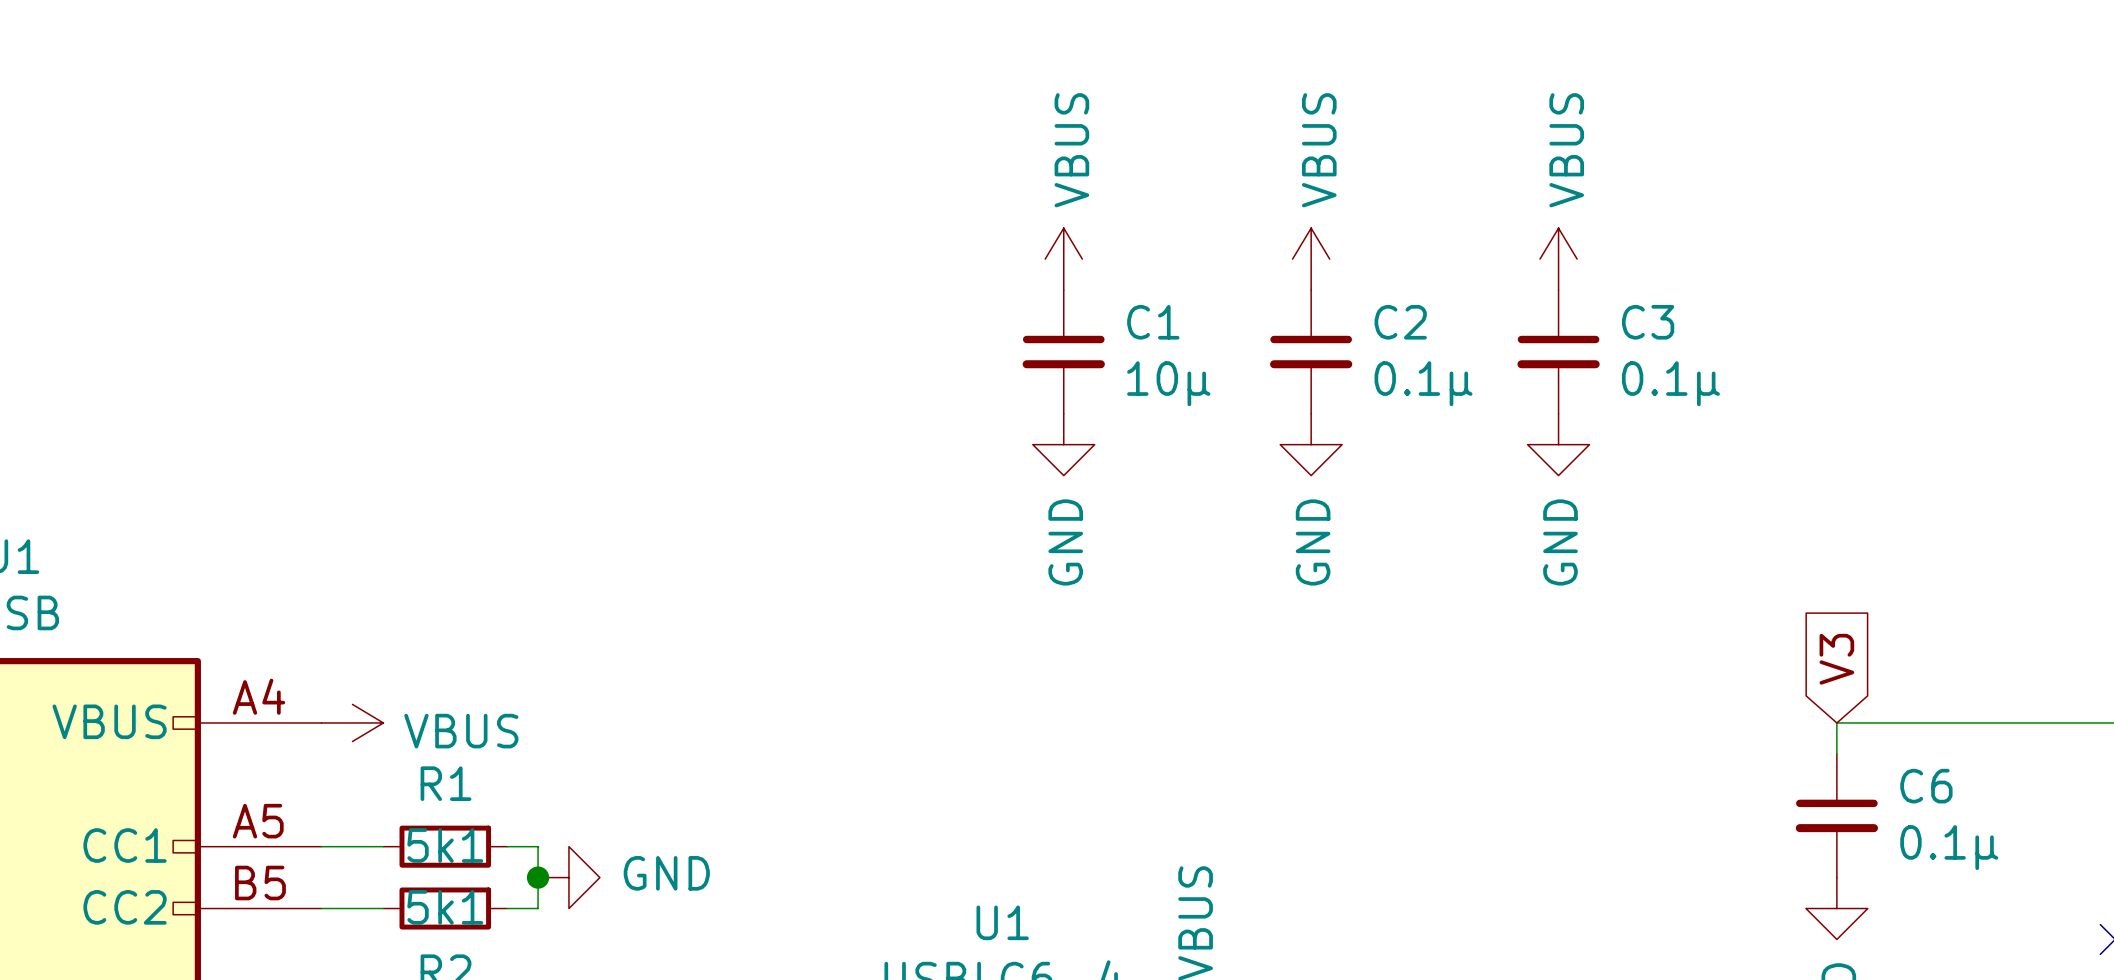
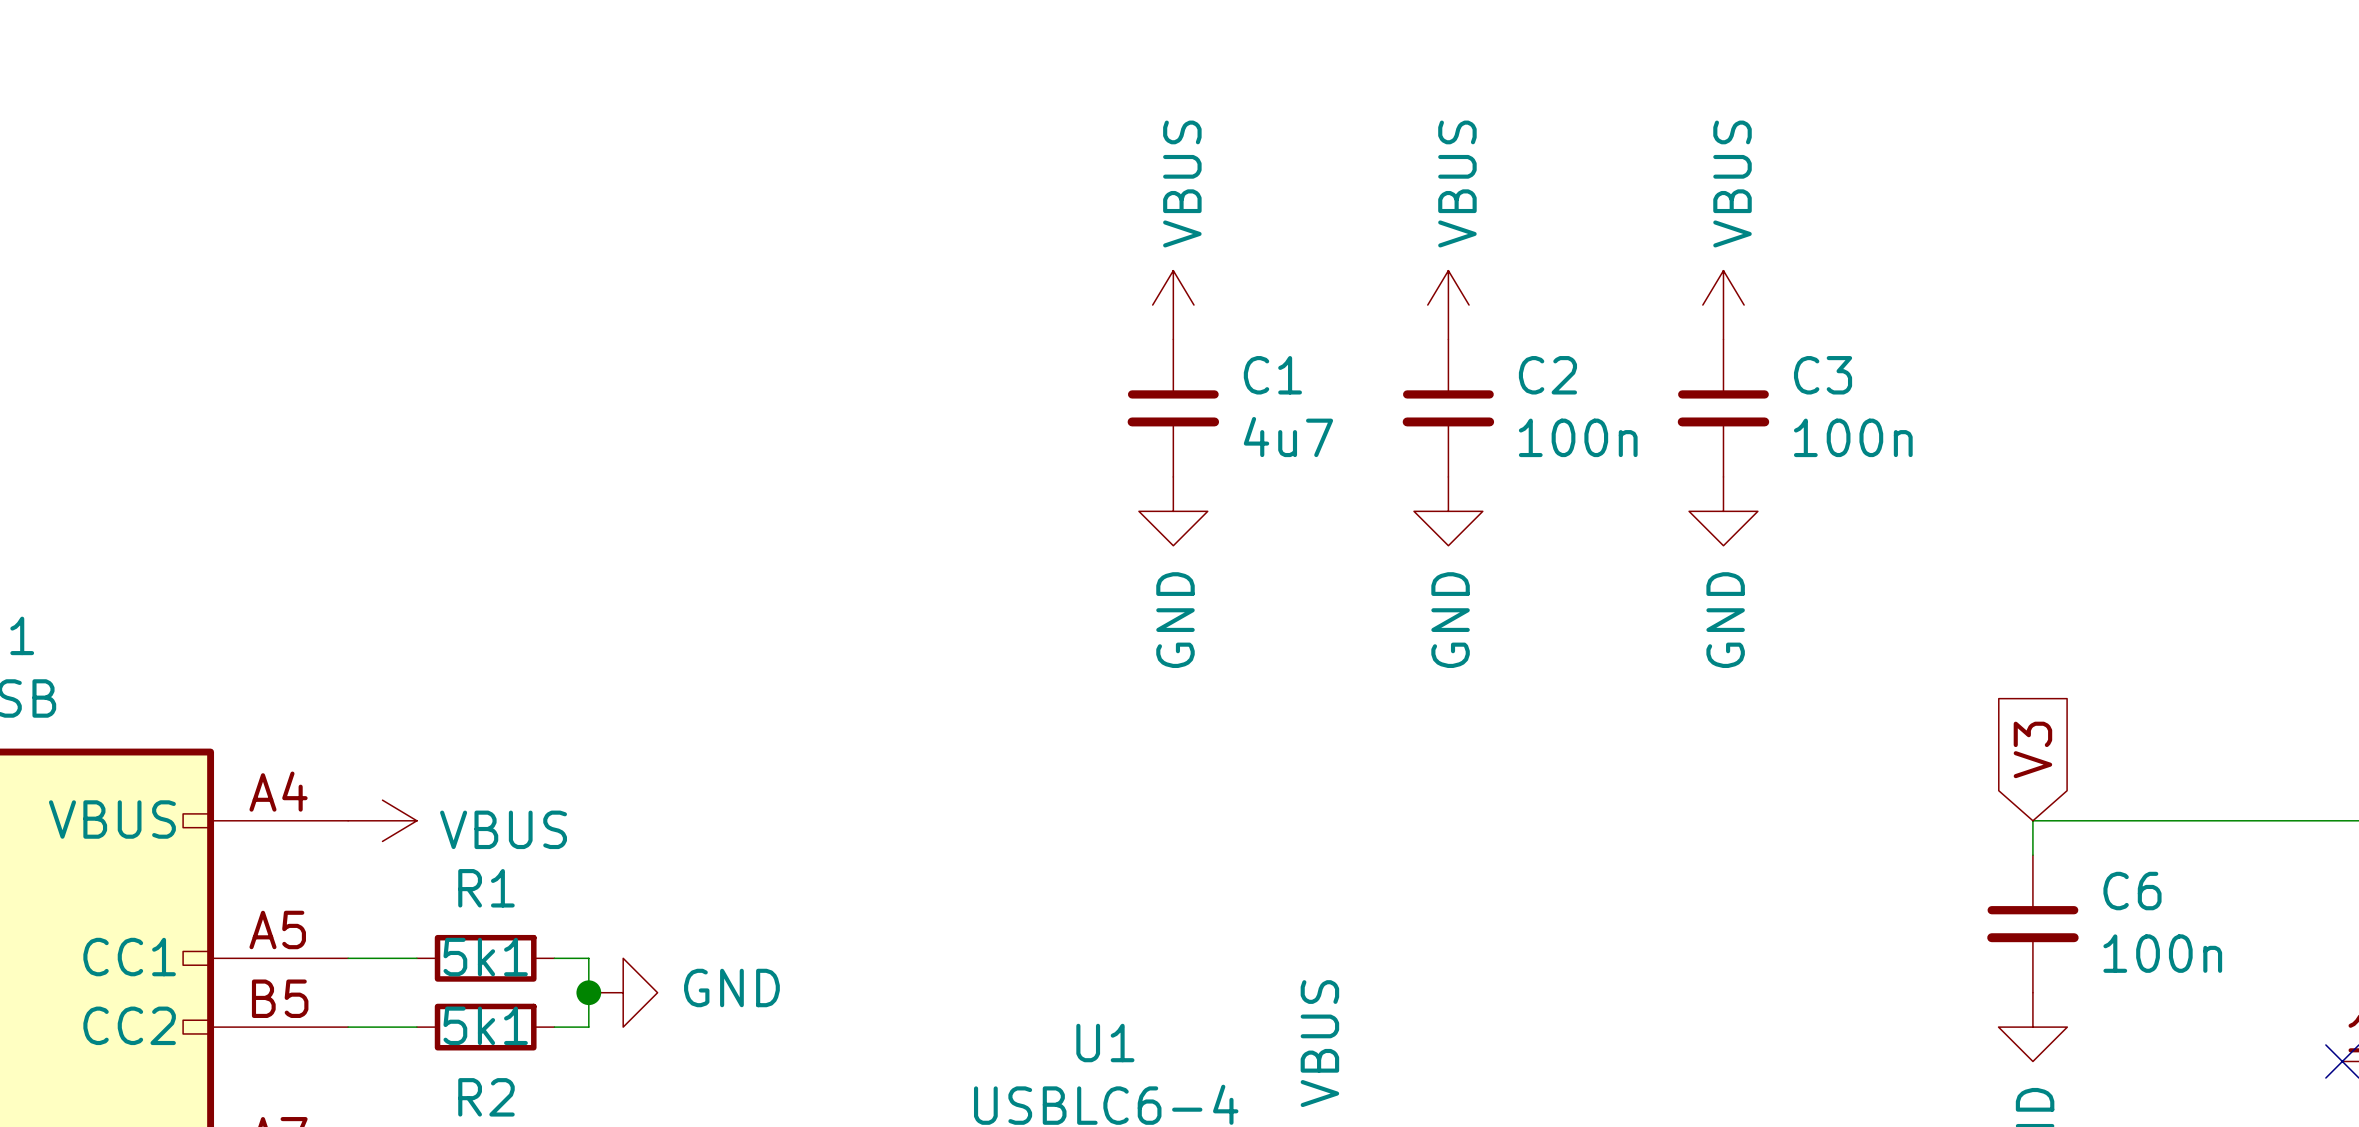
C1 value: 10µ (1168, 383) -> 4u7 (1288, 437)
C2 value: 0.1µ (1423, 383) -> 100n (1578, 437)
C3 value: 0.1µ (1670, 383) -> 100n (1853, 437)
C6 value: 0.1µ (1949, 847) -> 100n (2162, 953)

